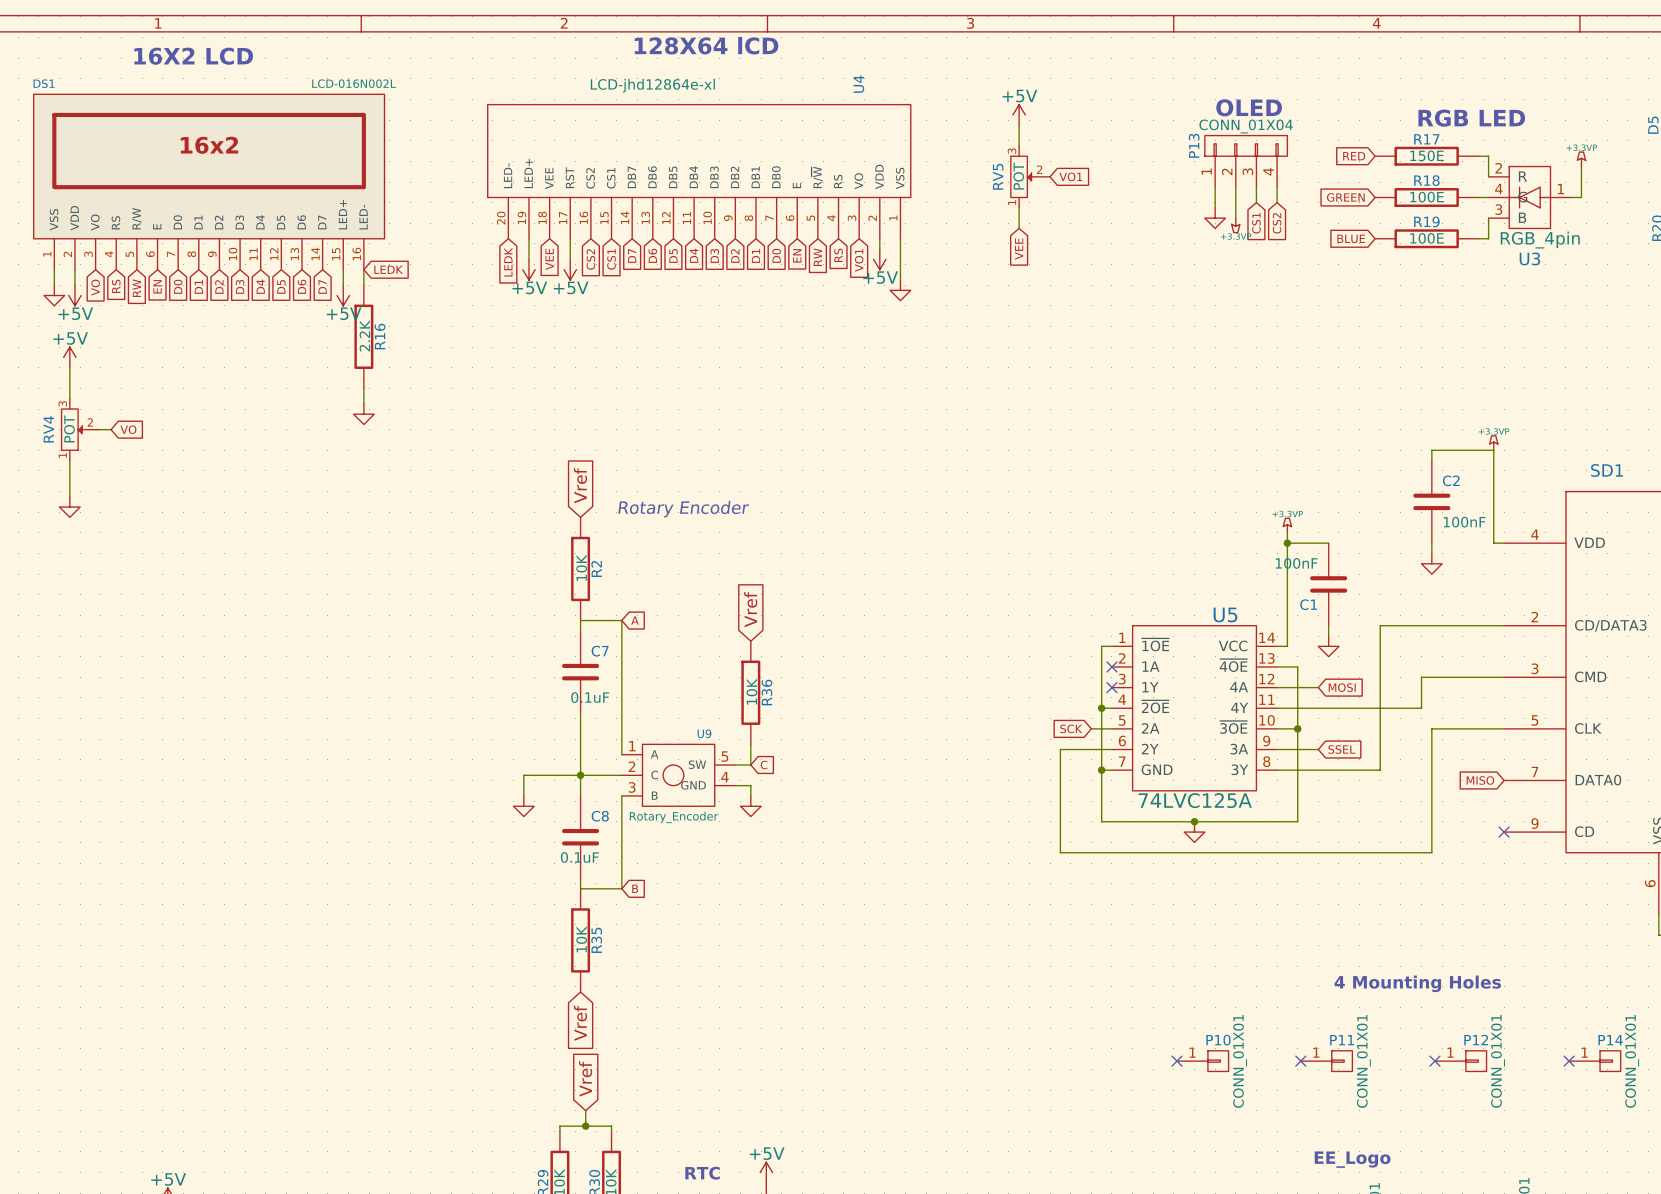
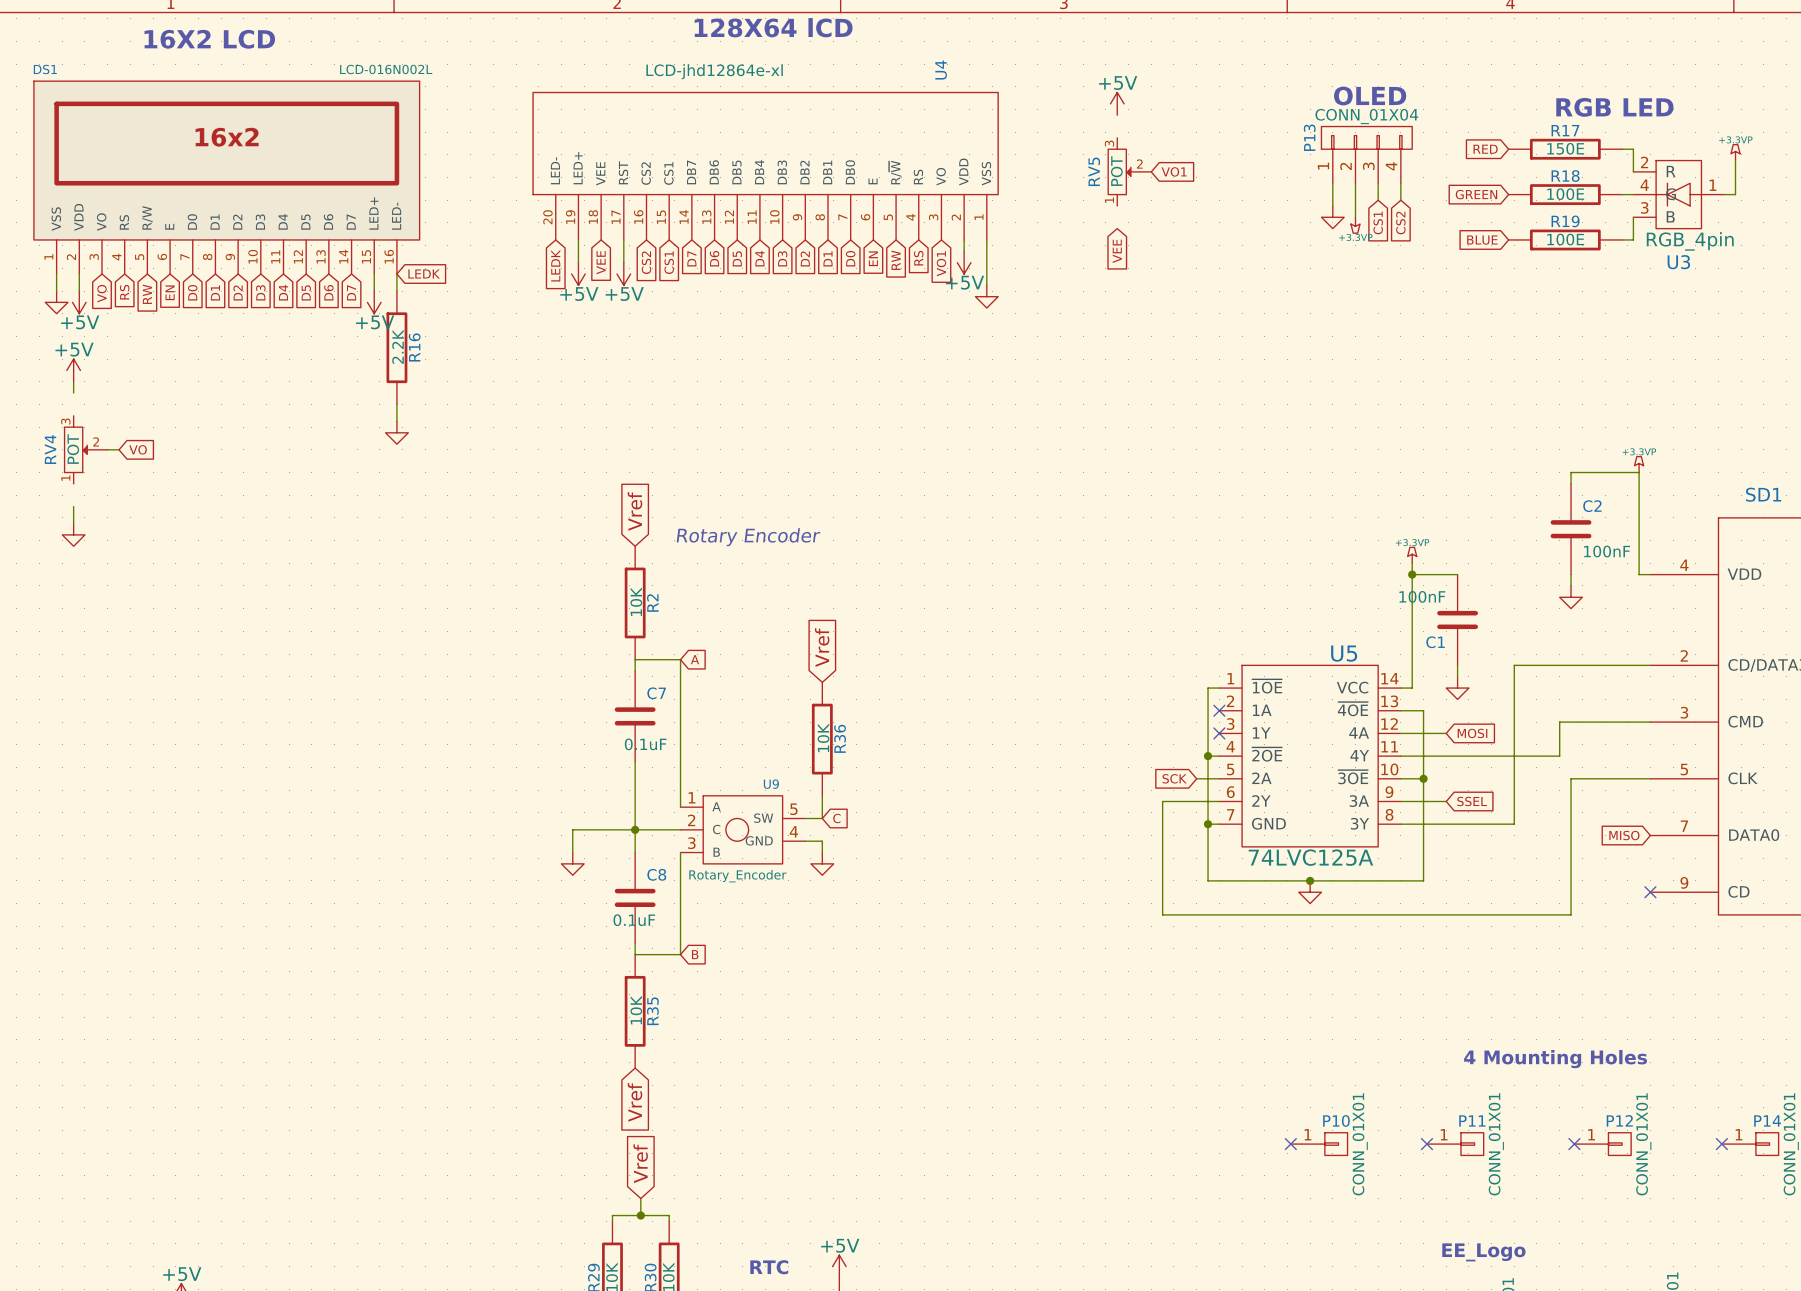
wire: (1019, 125) (1019, 145) -> none
wire: (1019, 207) (1019, 228) -> none
wire: (69, 378) (69, 398) -> none
wire: (69, 460) (69, 481) -> none

